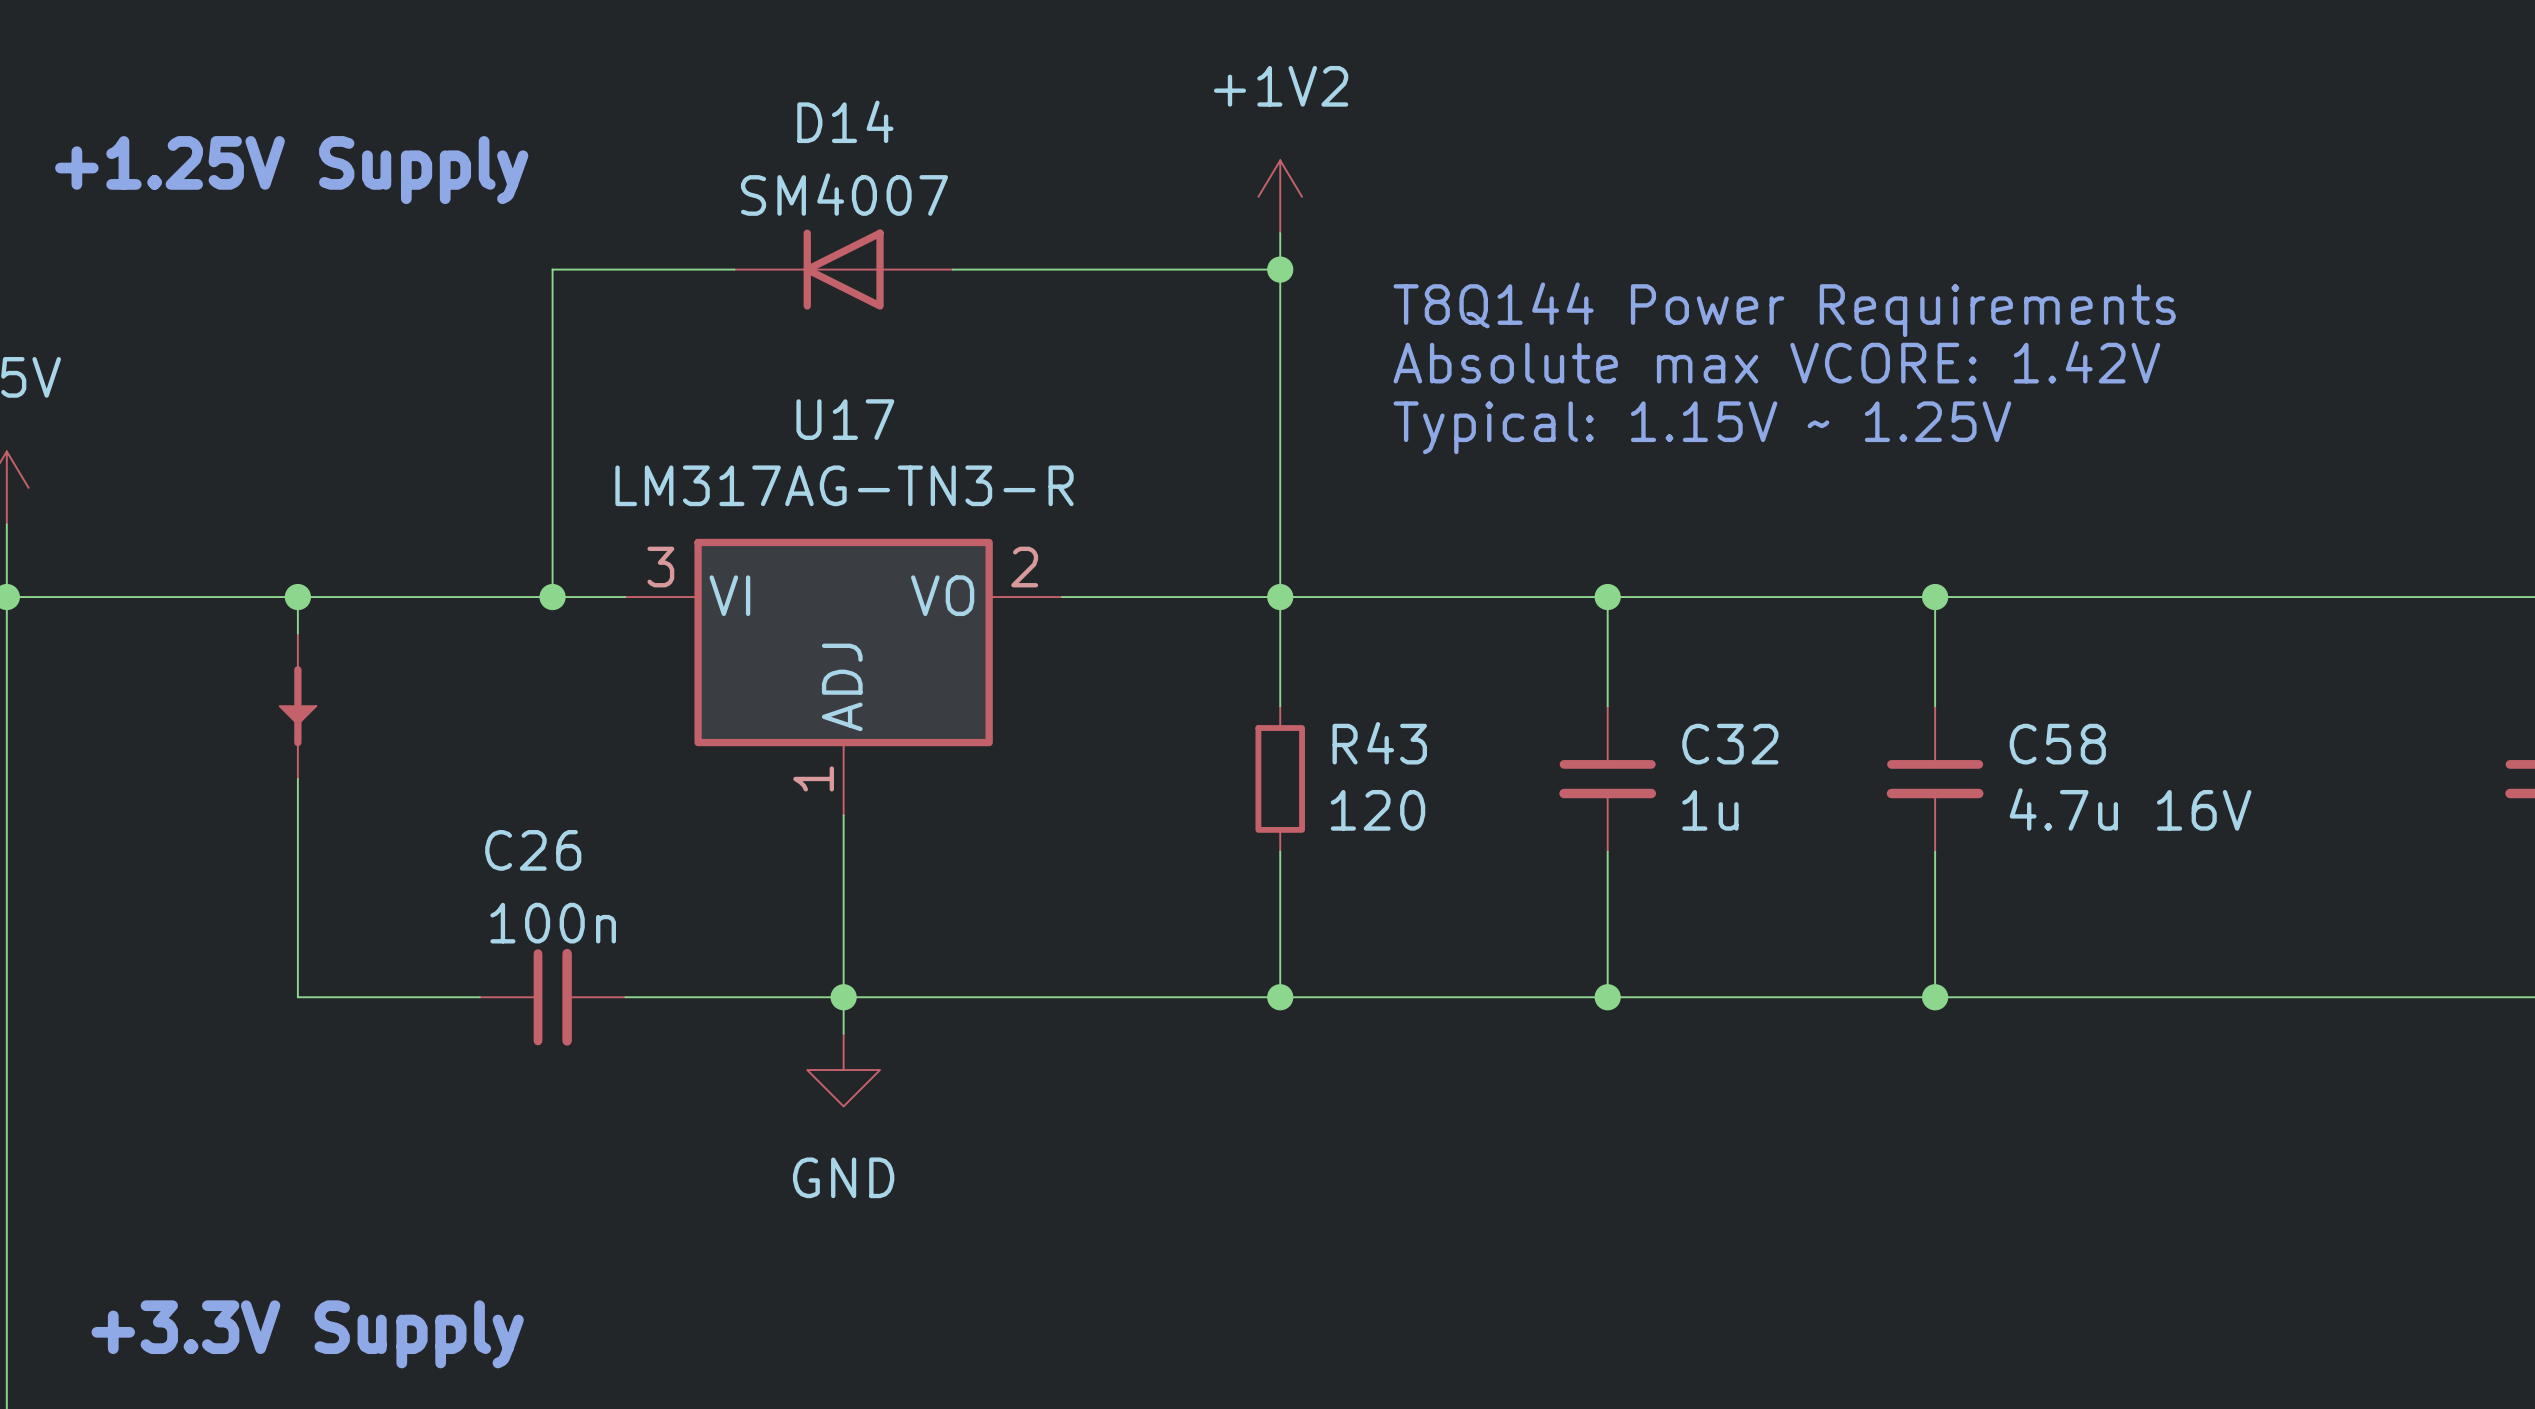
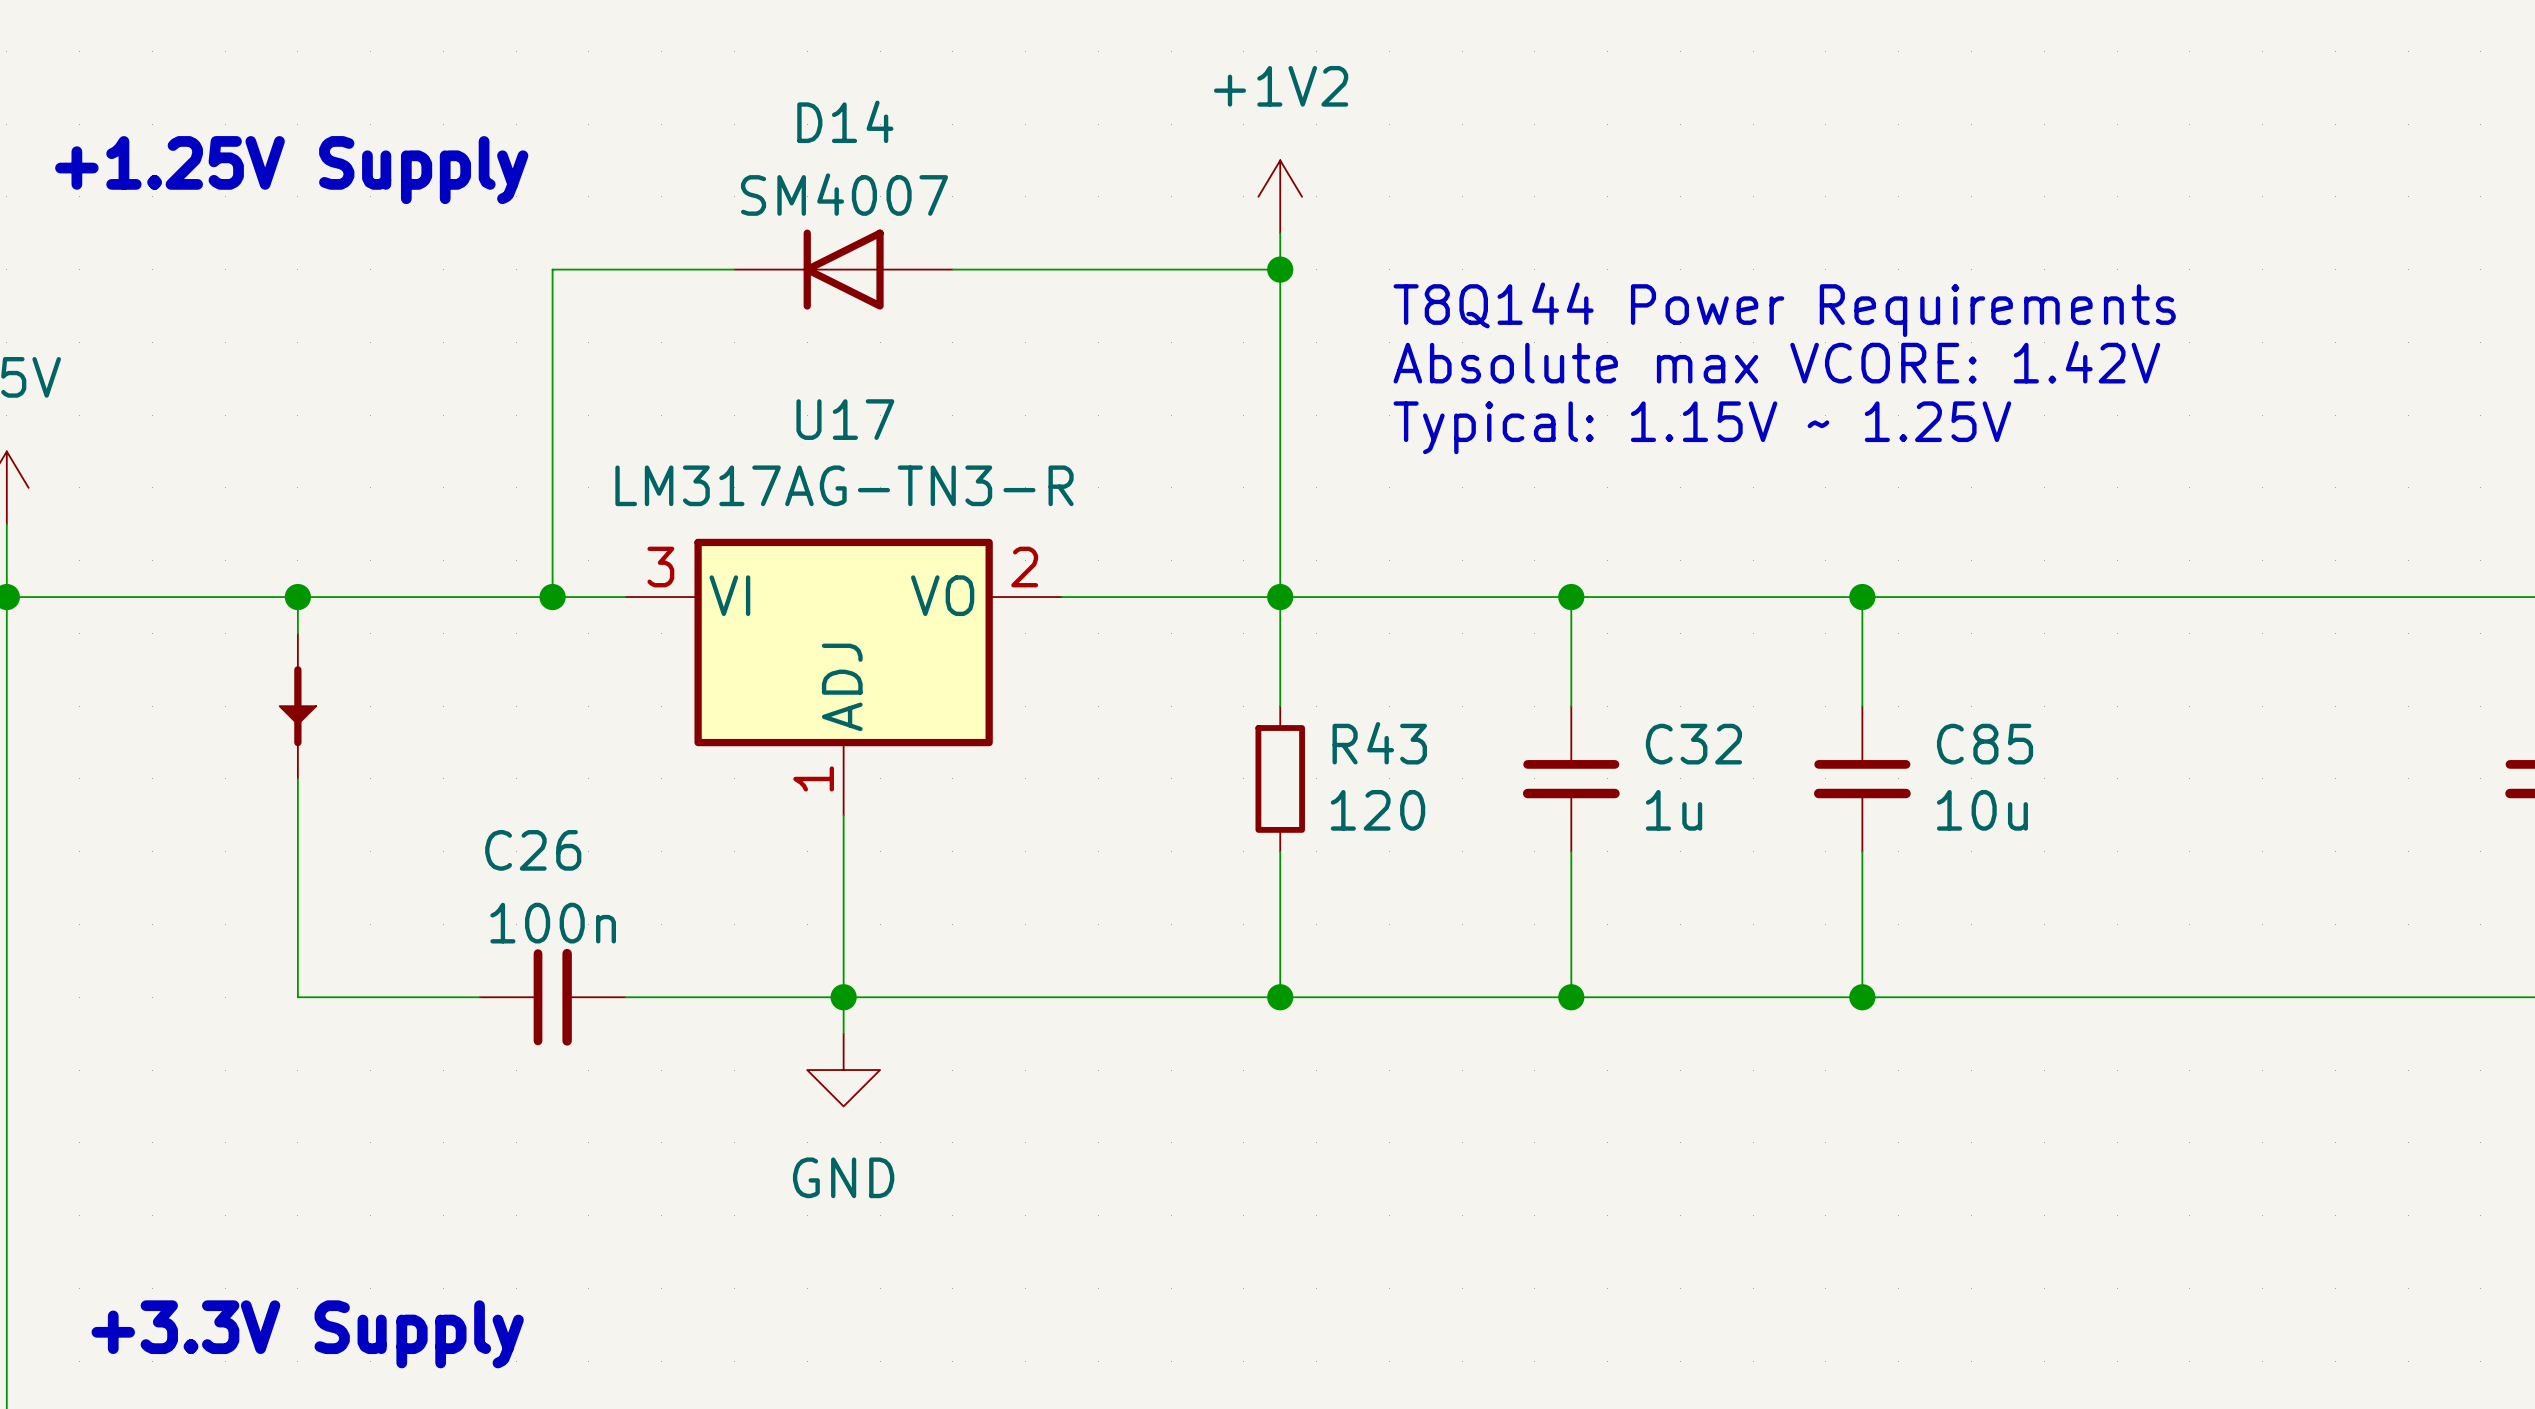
wire: (1607, 597) (1607, 706) -> (1571, 597) (1571, 706)
junction position: (1607, 597) -> (1571, 597)
wire: (1935, 597) (1935, 706) -> (1862, 597) (1862, 706)
junction position: (1935, 597) -> (1862, 597)
C32 position: (1607, 778) -> (1571, 778)
C85: none -> 10u (1862, 778)
C58: 4.7u 16V (1935, 778) -> none
wire: (1607, 851) (1607, 997) -> (1571, 851) (1571, 997)
wire: (1935, 851) (1935, 997) -> (1862, 851) (1862, 997)
junction position: (1607, 997) -> (1571, 997)
junction position: (1935, 997) -> (1862, 997)

